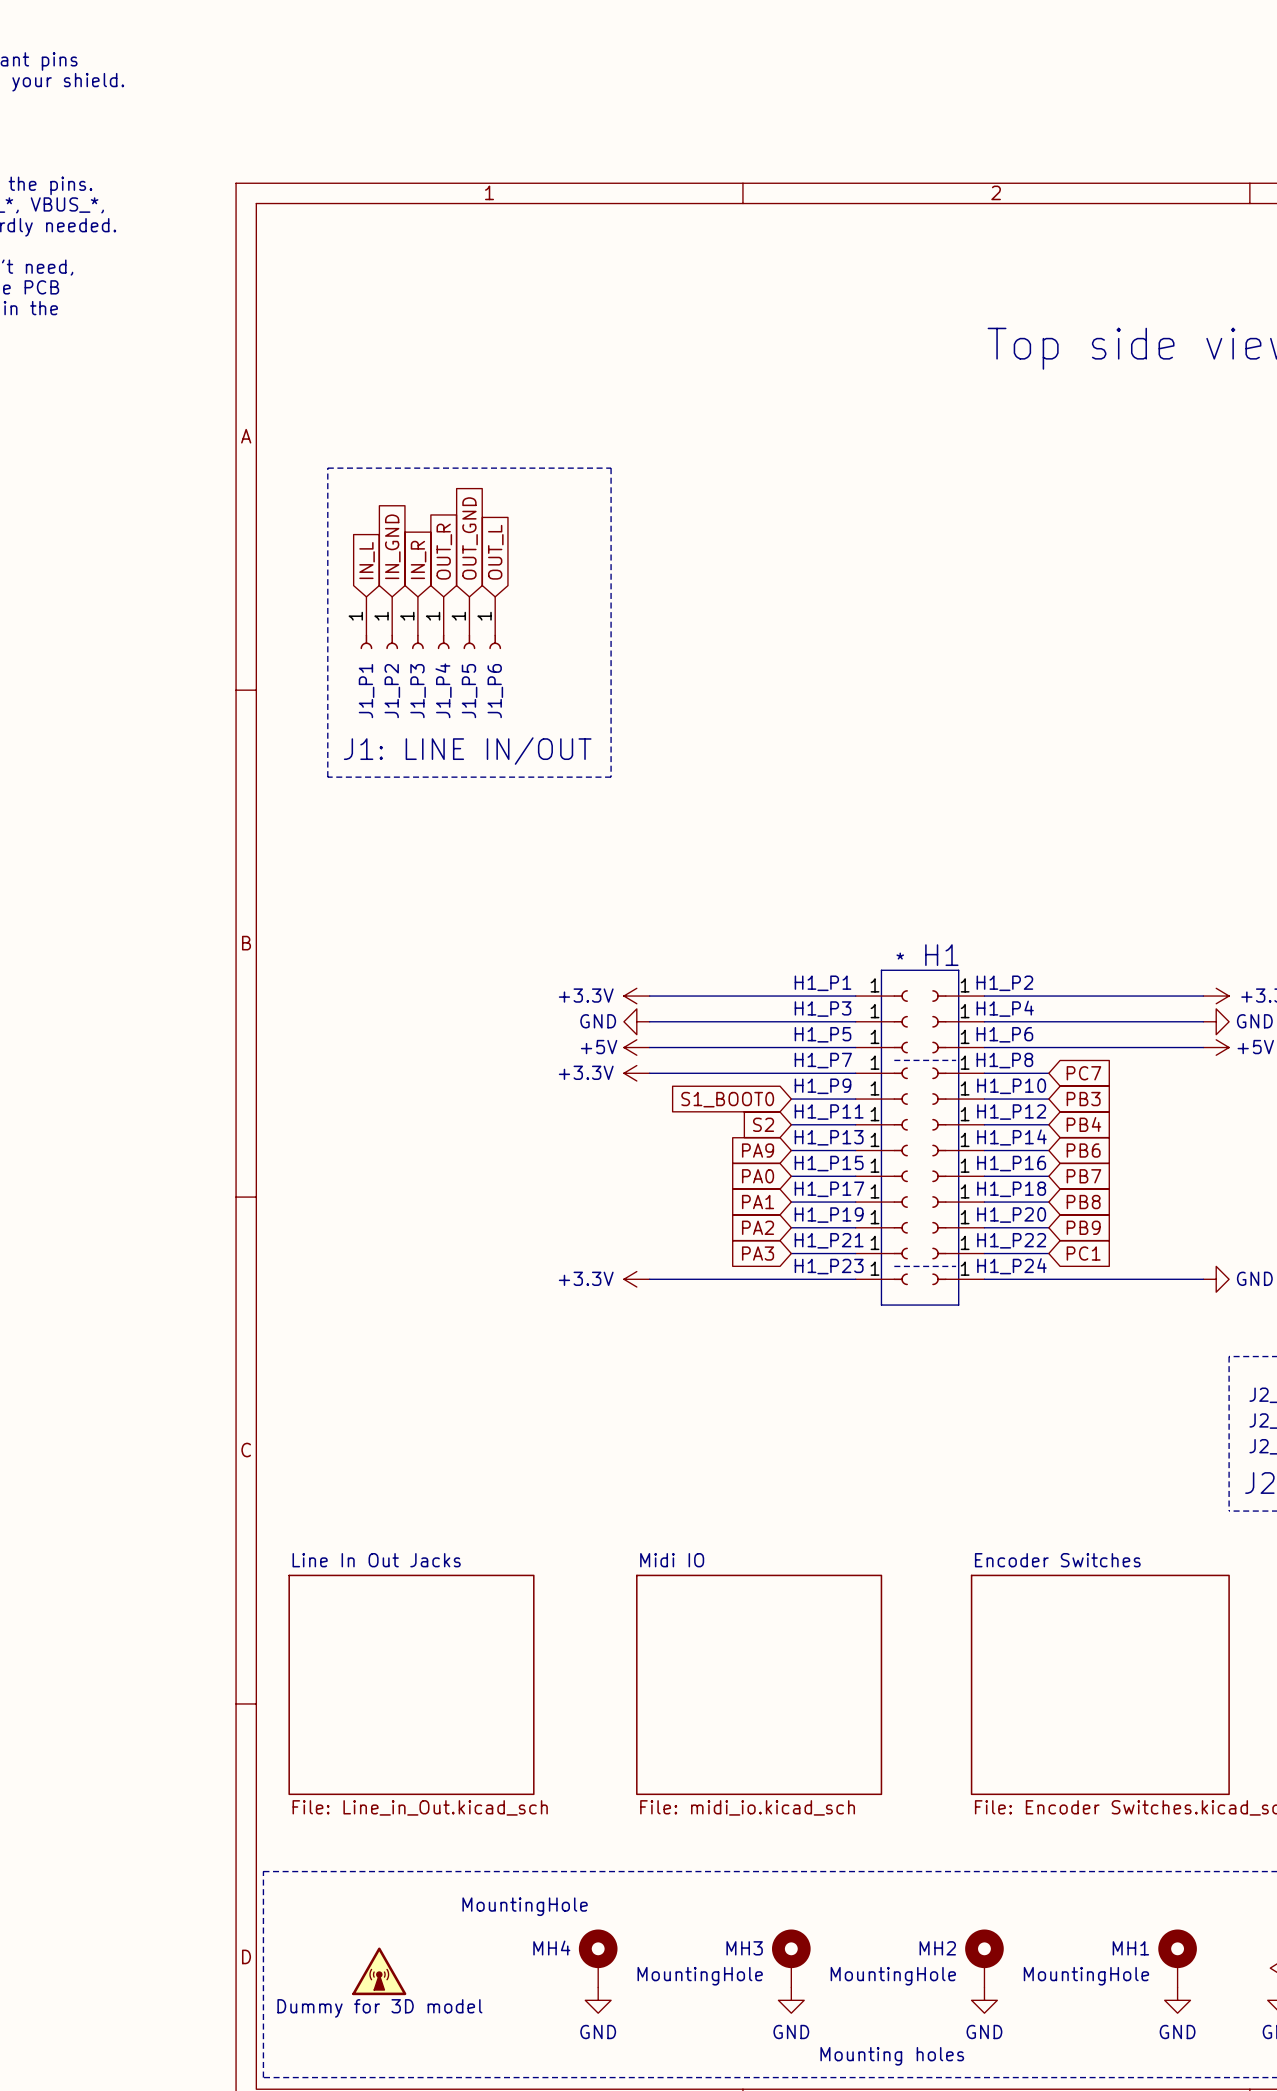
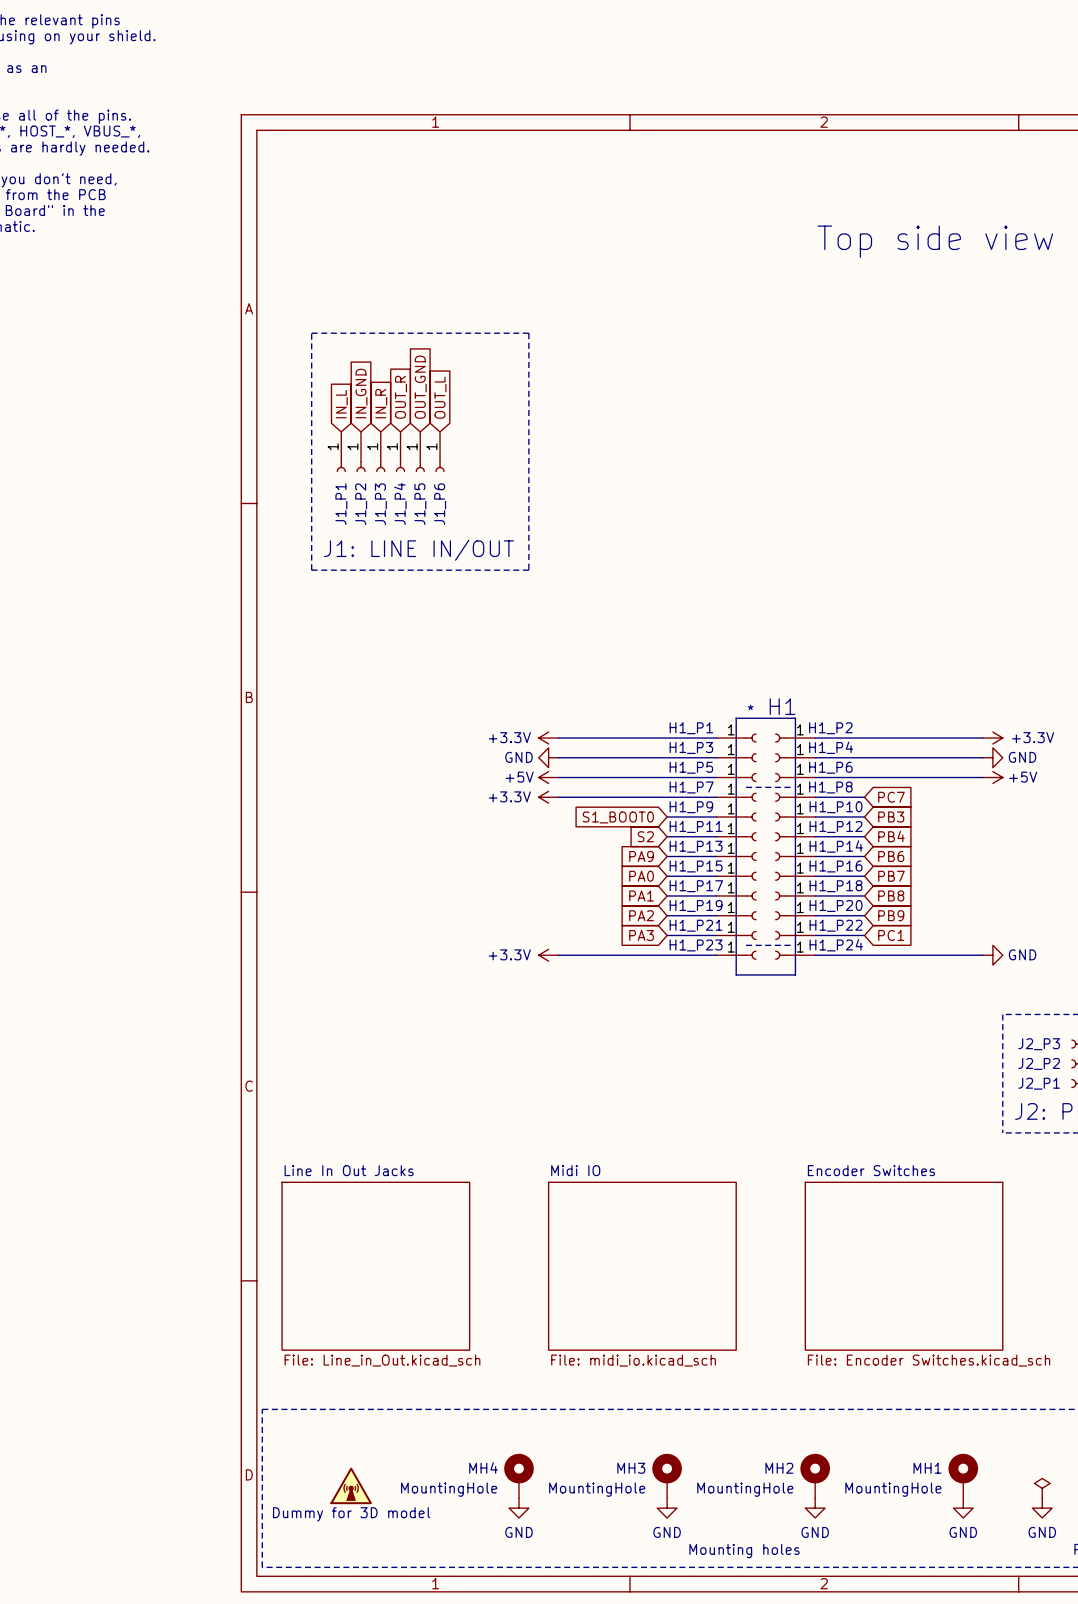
MH4 value position: MountingHole (525, 1906) -> MountingHole (449, 1489)

